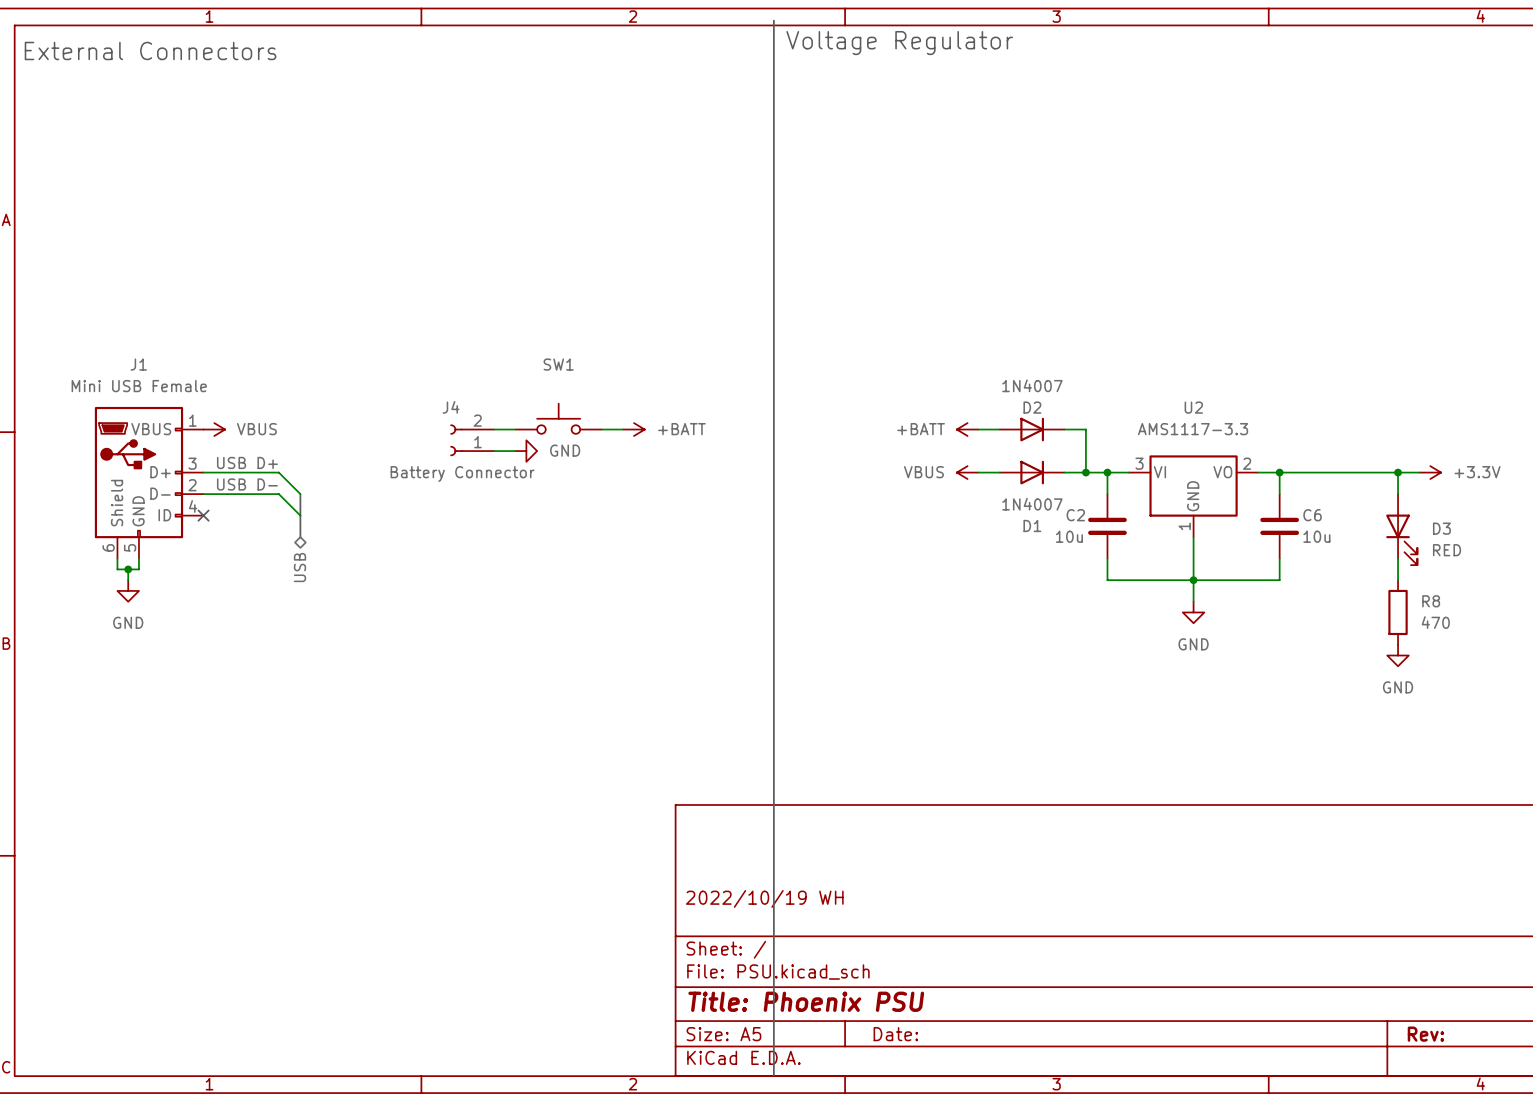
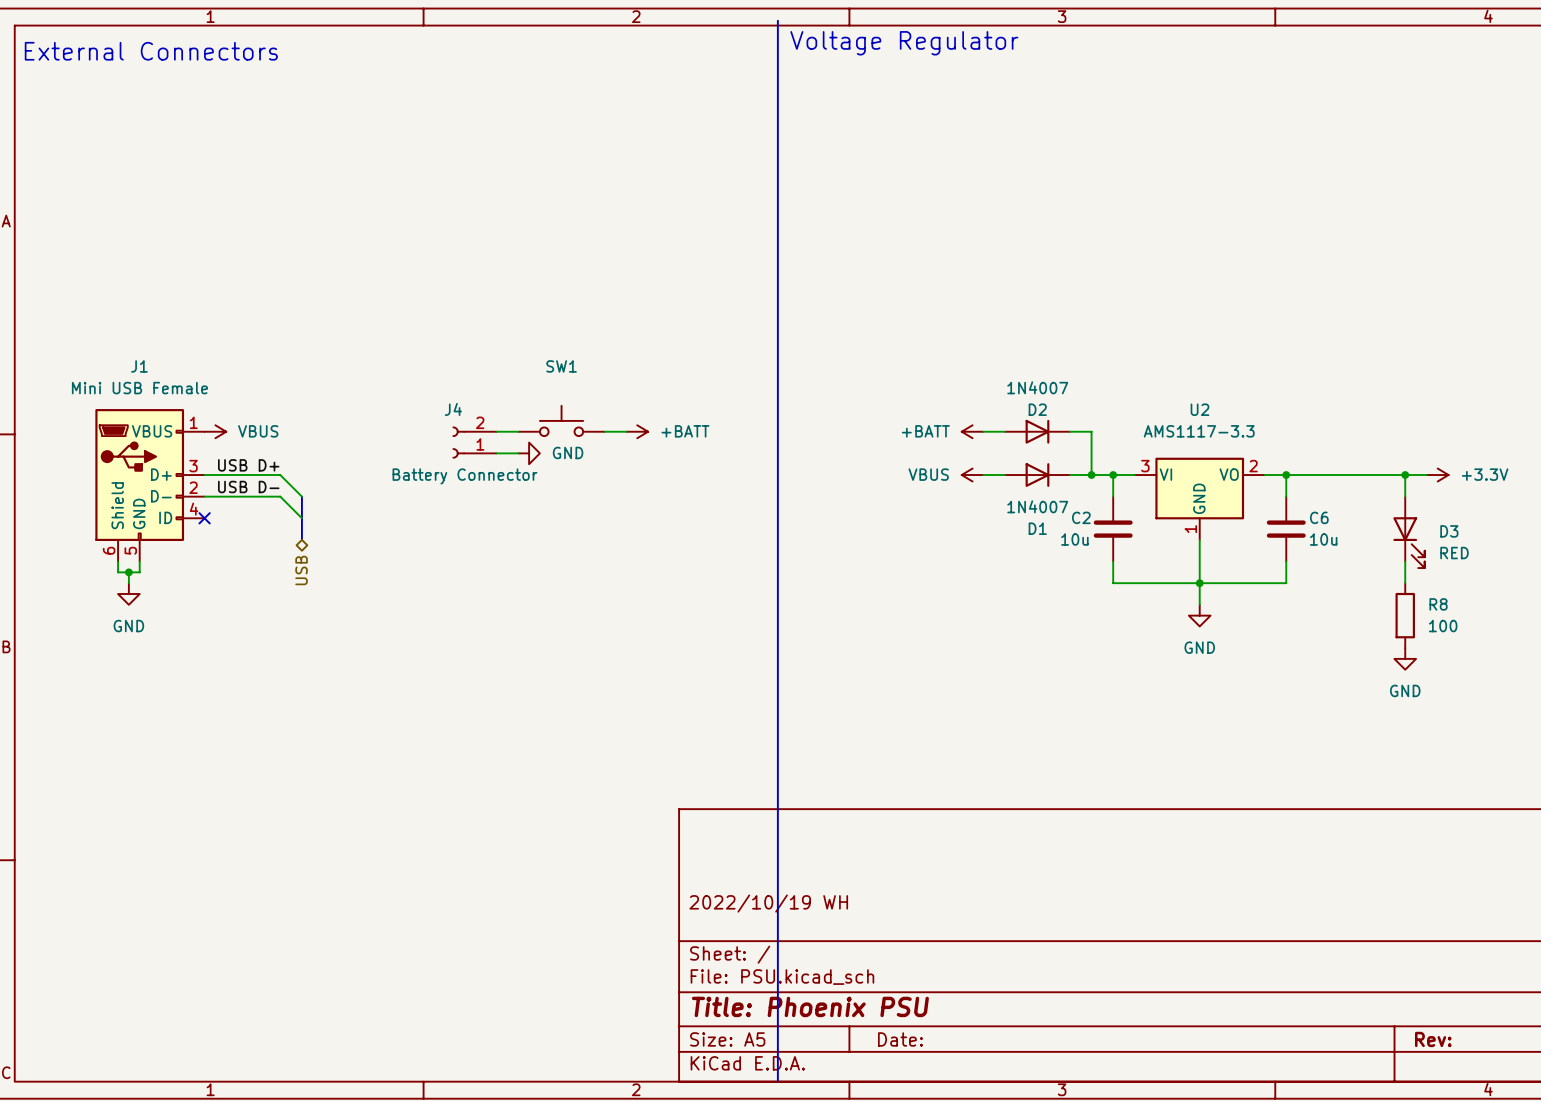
R8 value: 470 (1435, 622) -> 100 (1443, 626)

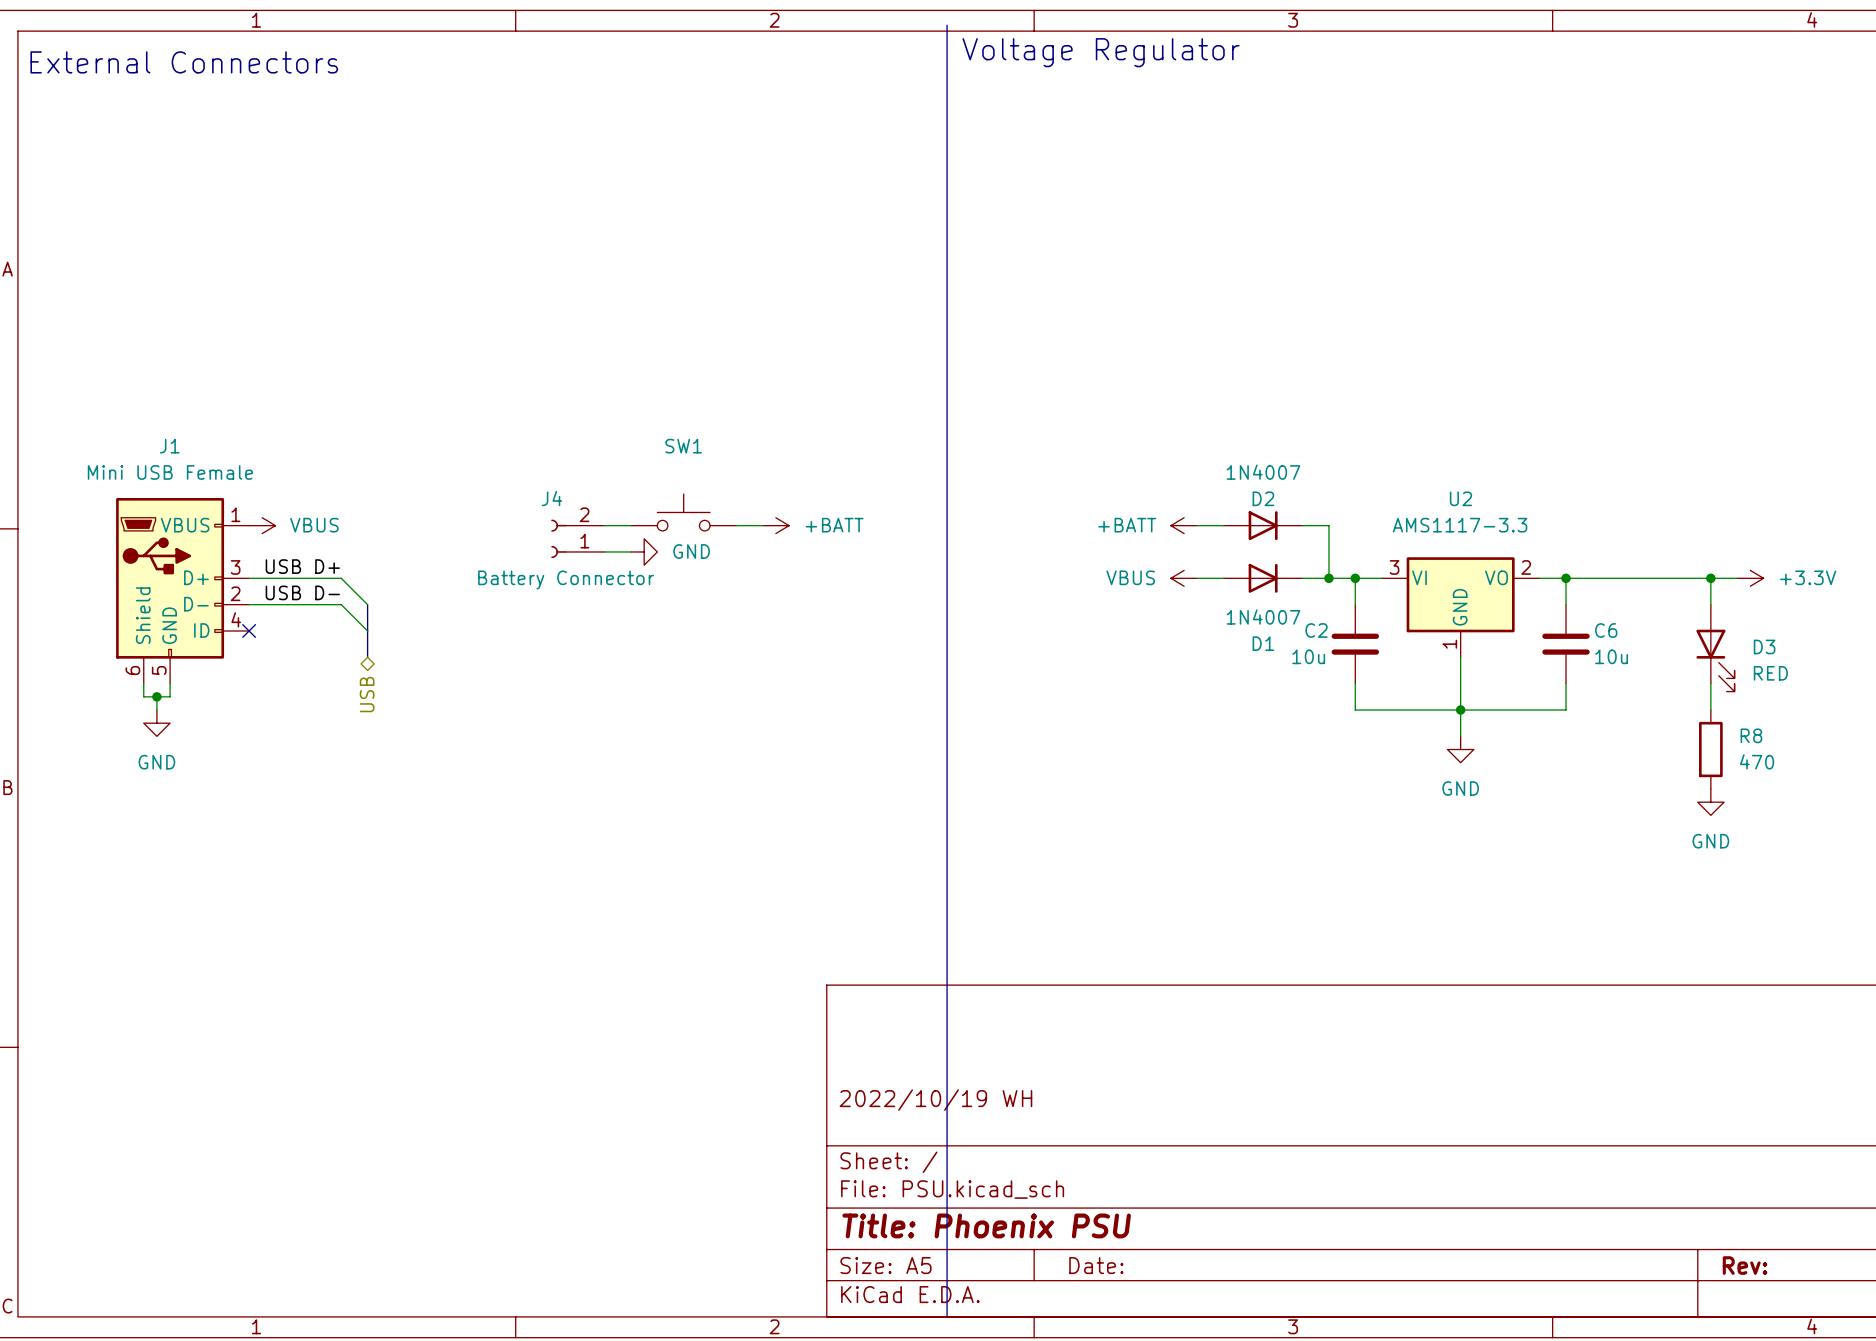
R8 value: 100 (1443, 626) -> 470 (1757, 761)

